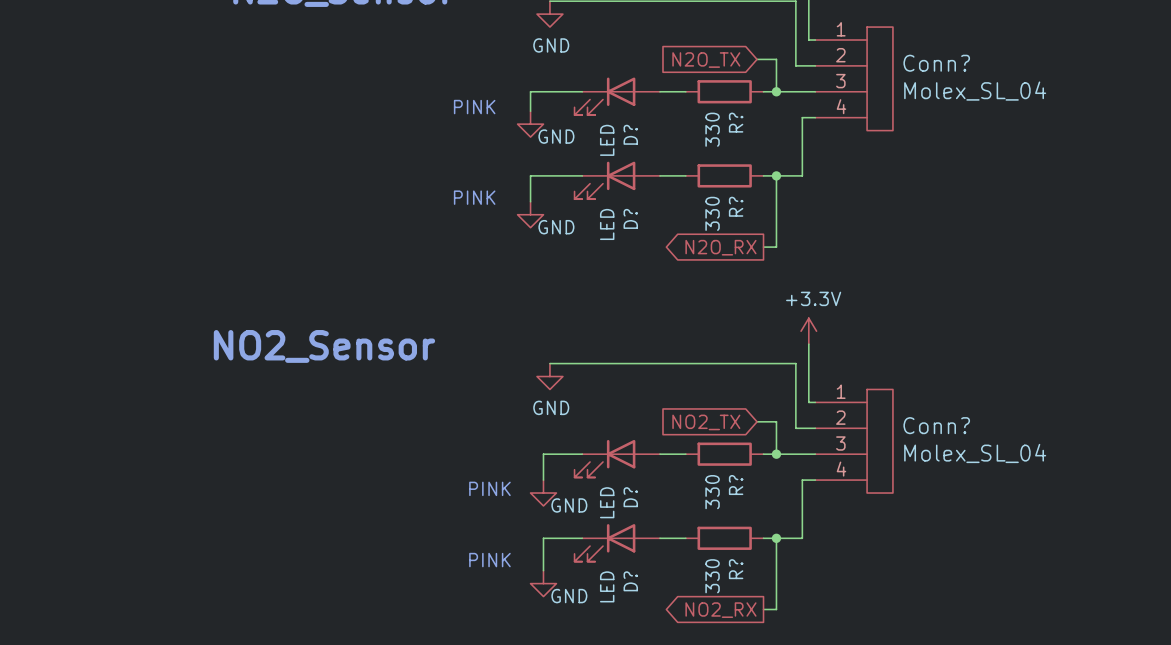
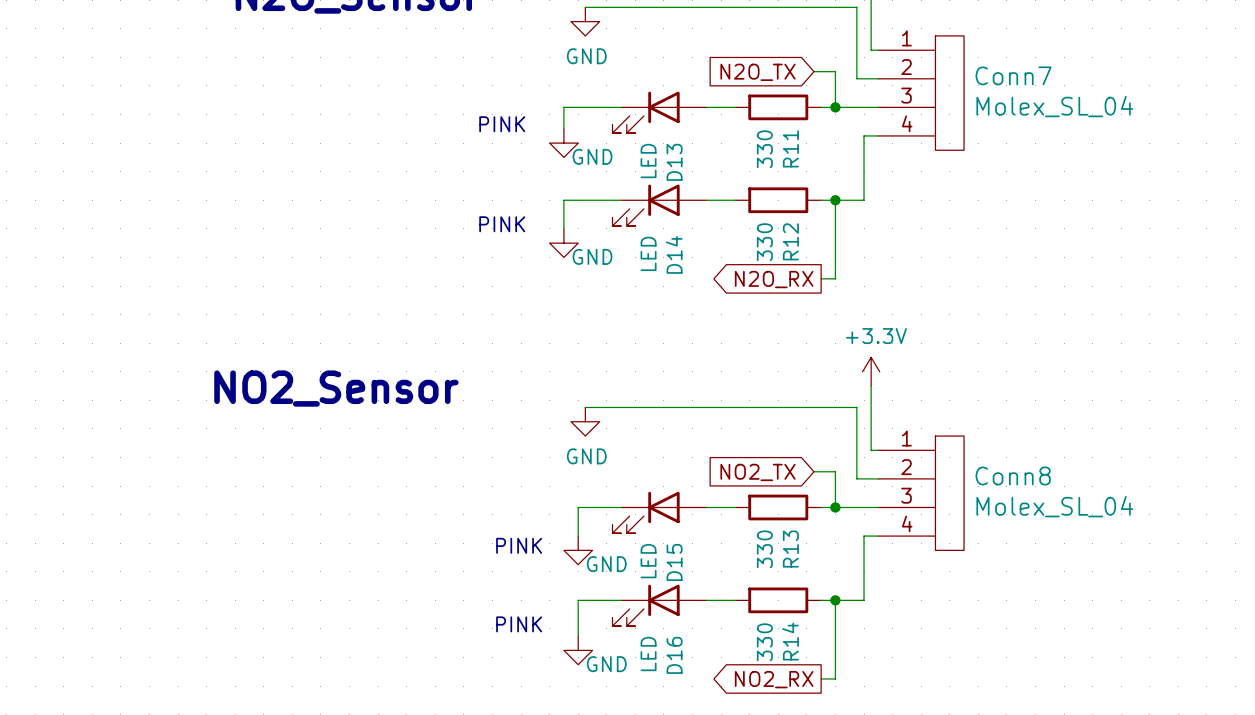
Conn? name: Conn? (936, 63) -> Conn7 (1013, 75)
R? name: R? (736, 122) -> R11 (790, 148)
D? name: D? (630, 134) -> D13 (674, 162)
R? name: R? (736, 206) -> R12 (790, 241)
D? name: D? (630, 218) -> D14 (674, 254)
Conn? name: Conn? (936, 425) -> Conn8 (1013, 475)
R? name: R? (736, 485) -> R13 (790, 549)
D? name: D? (630, 497) -> D15 (674, 562)
R? name: R? (736, 569) -> R14 (790, 641)
D? name: D? (630, 581) -> D16 (674, 655)

